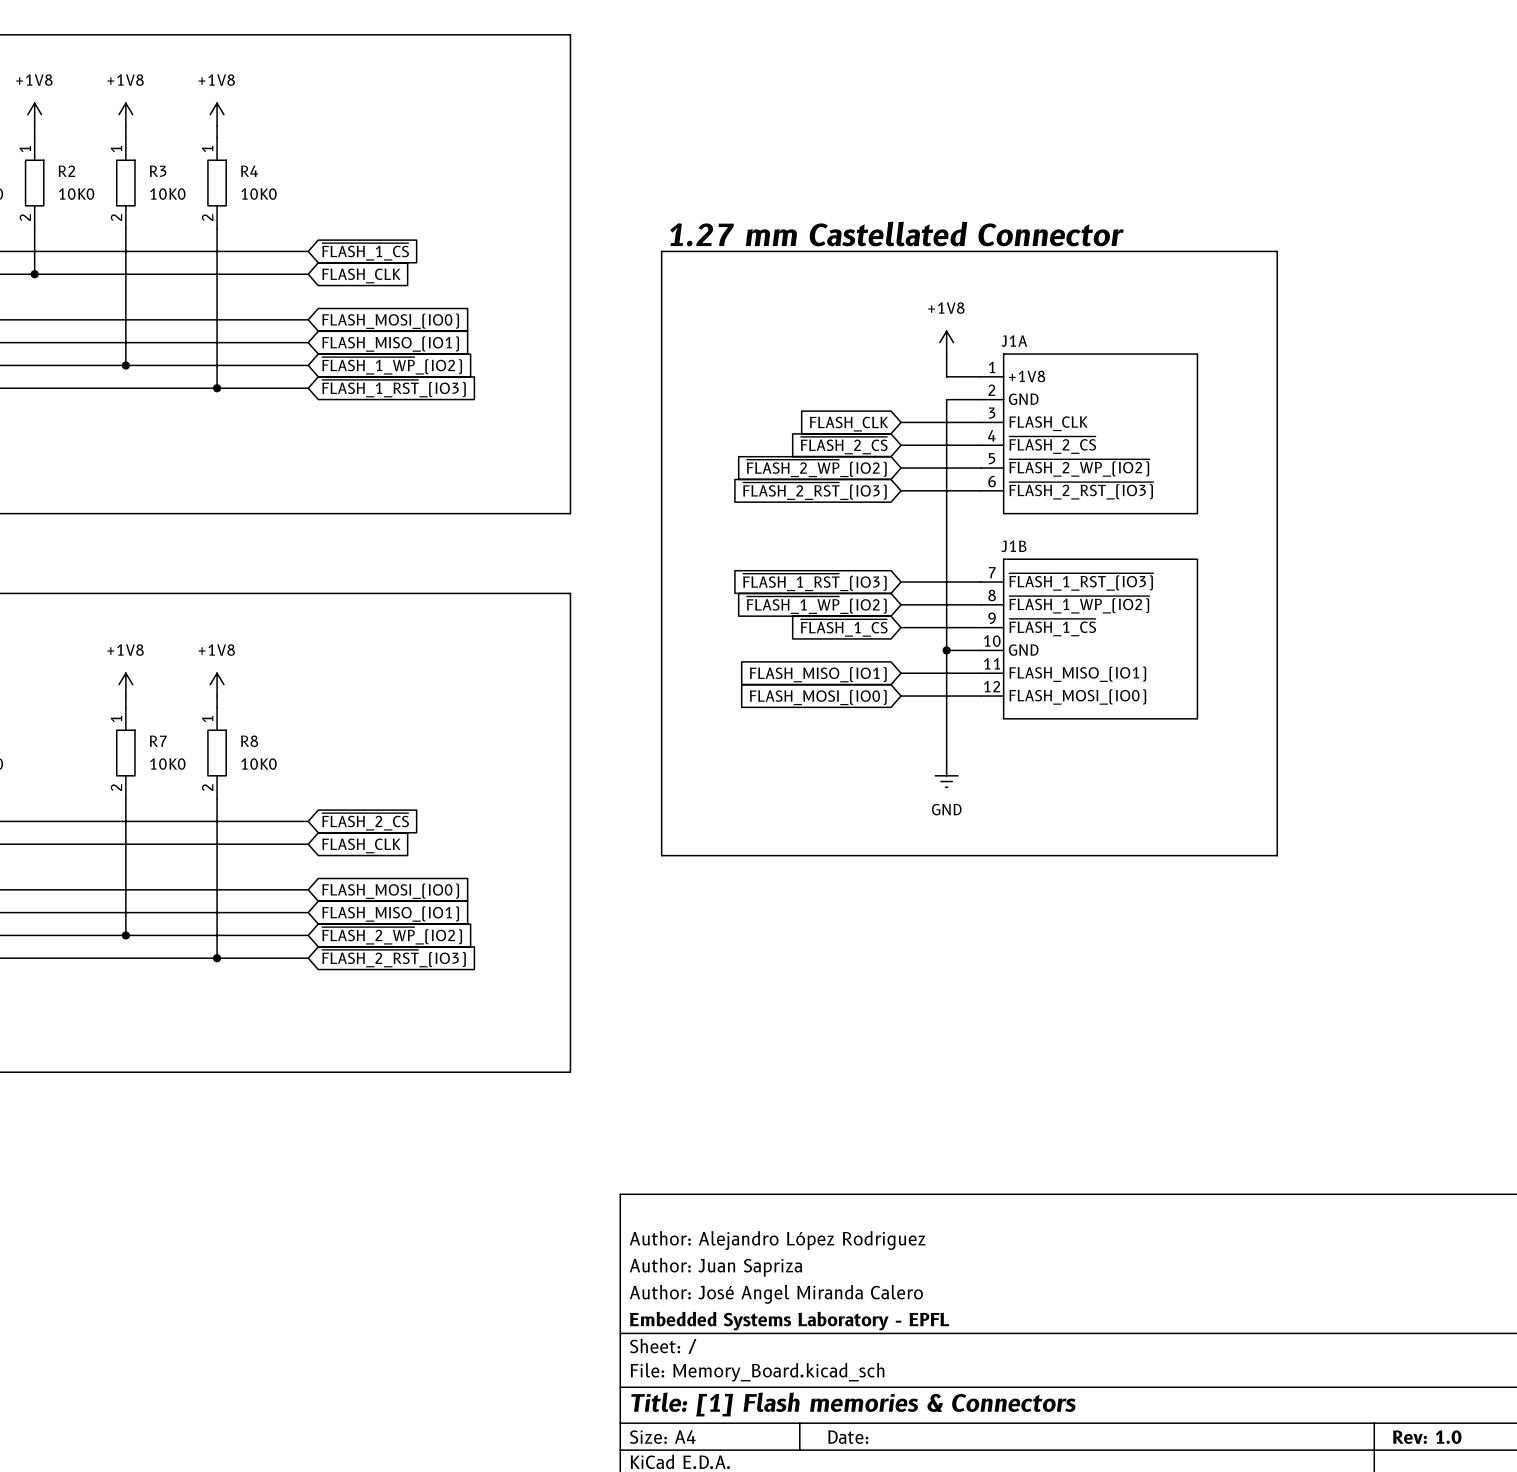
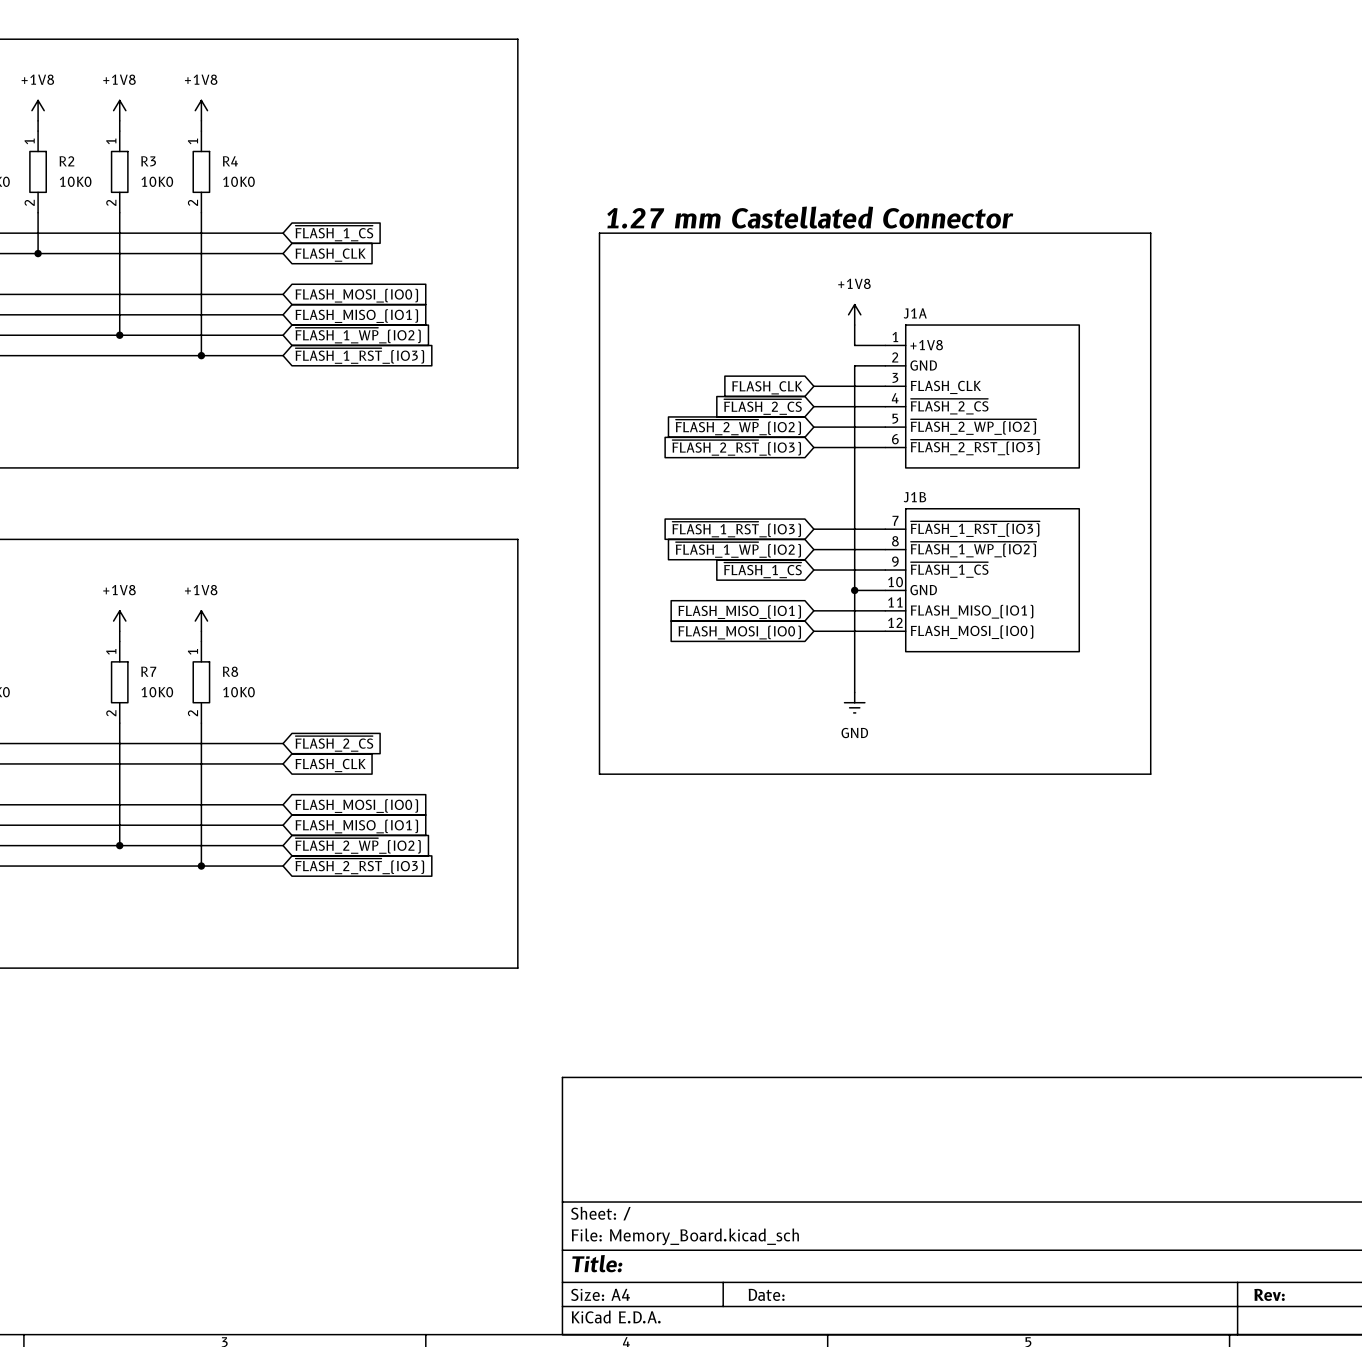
title block: Author: Alejandro López Rodriguez (777, 1240) -> none
title block: Author: Juan Sapriza (715, 1267) -> none
title block: Author: José Angel Miranda Calero (776, 1294) -> none
title block: Embedded Systems Laboratory - EPFL (789, 1321) -> none
title block: Title: [1] Flash memories & Connectors (853, 1404) -> Title: (597, 1263)
title block: Rev: 1.0 (1427, 1437) -> Rev: (1269, 1294)

